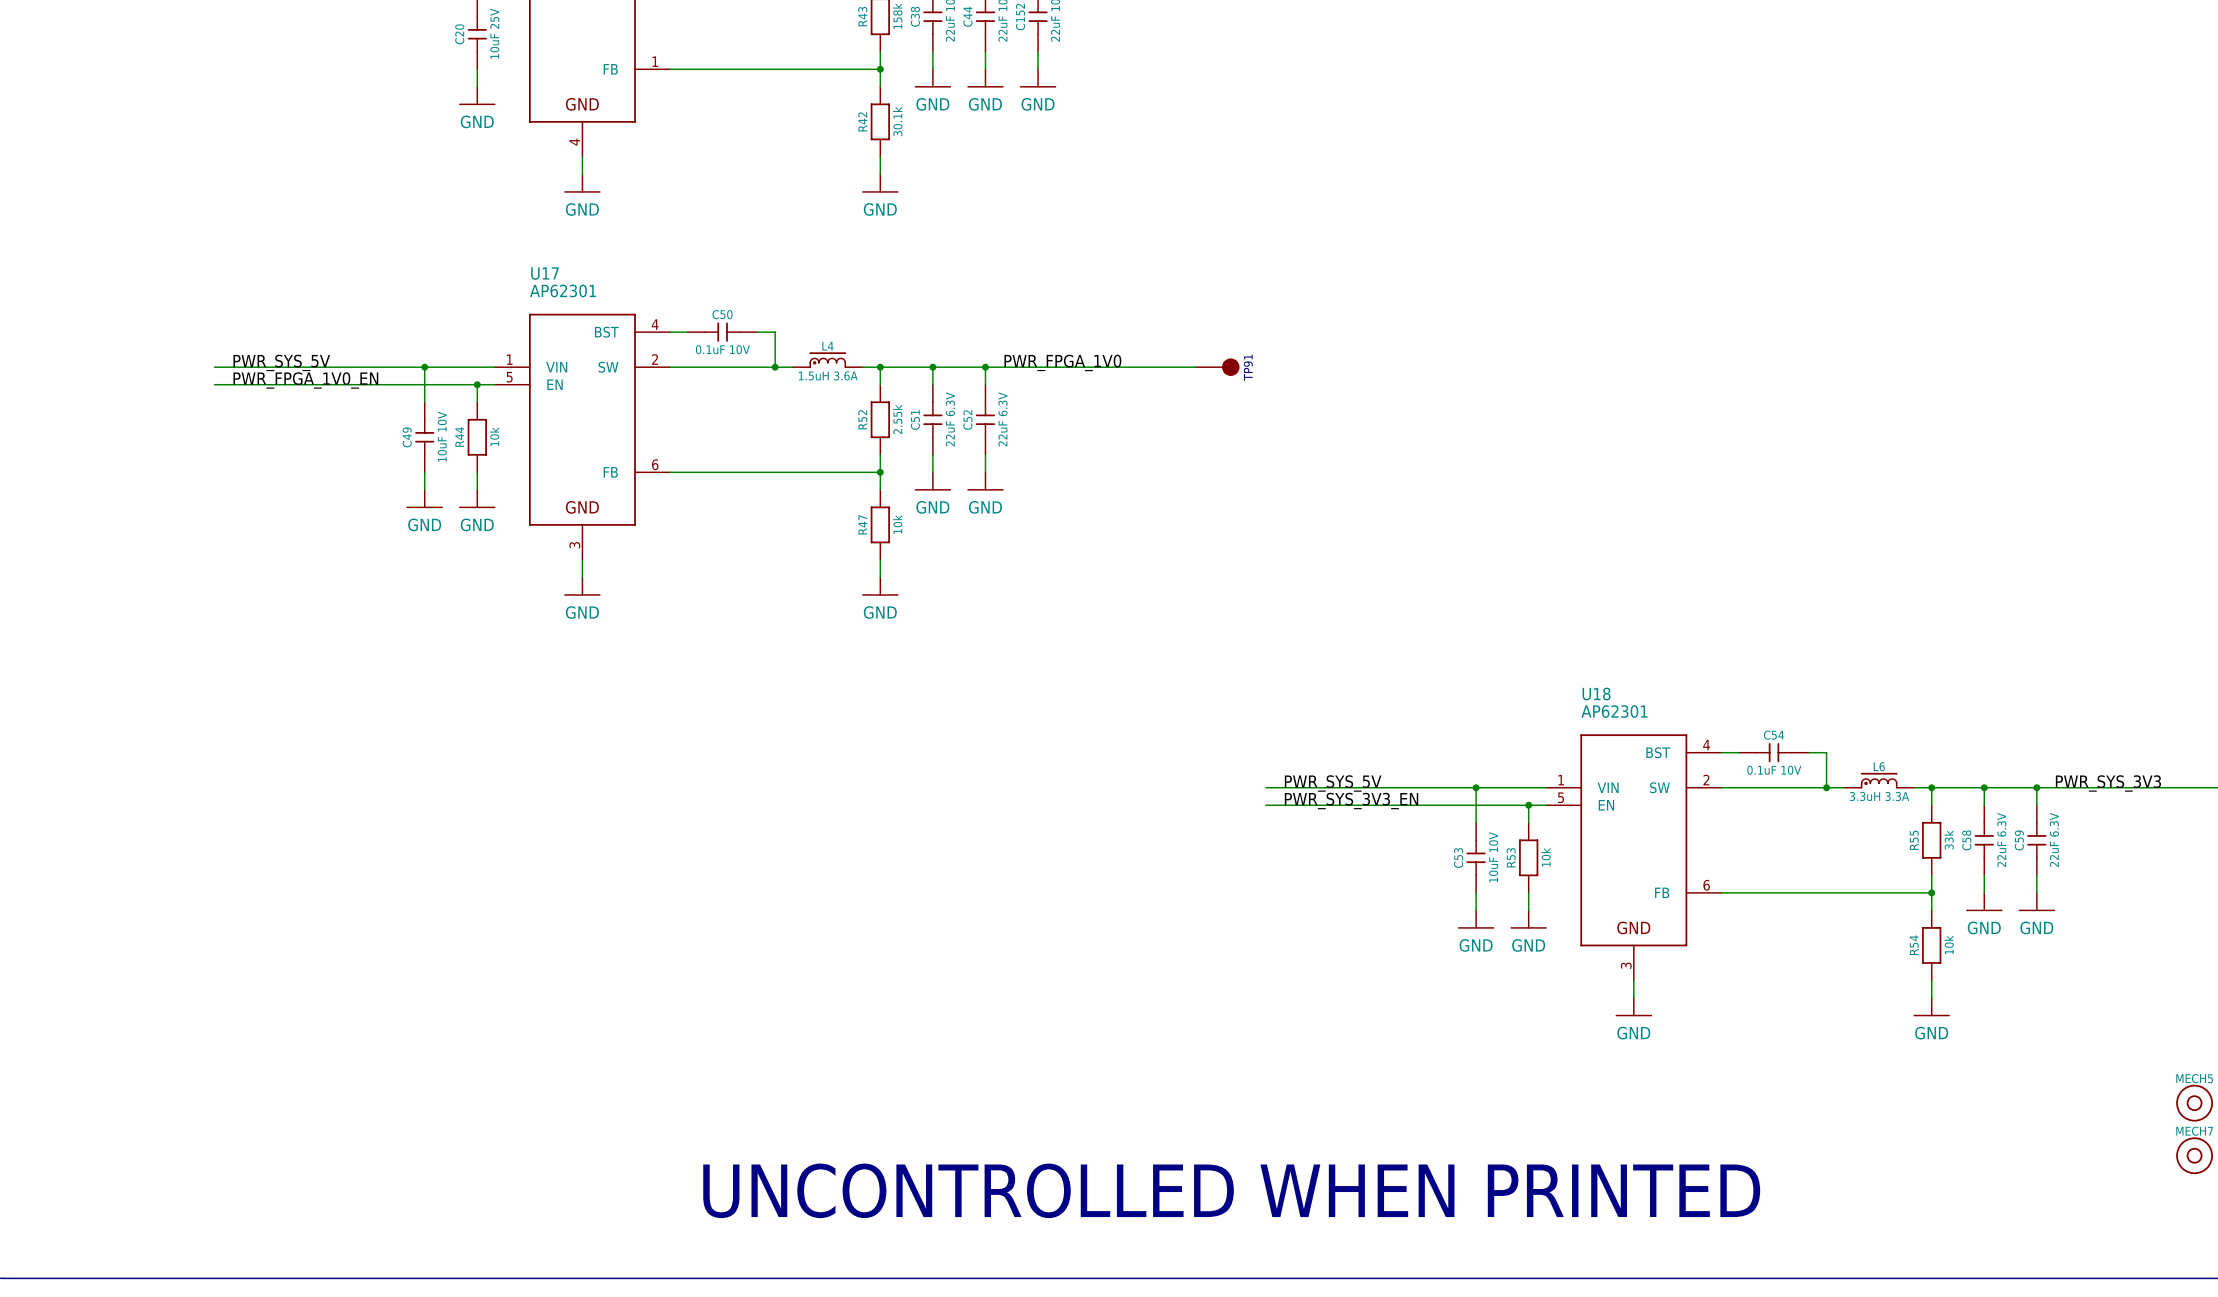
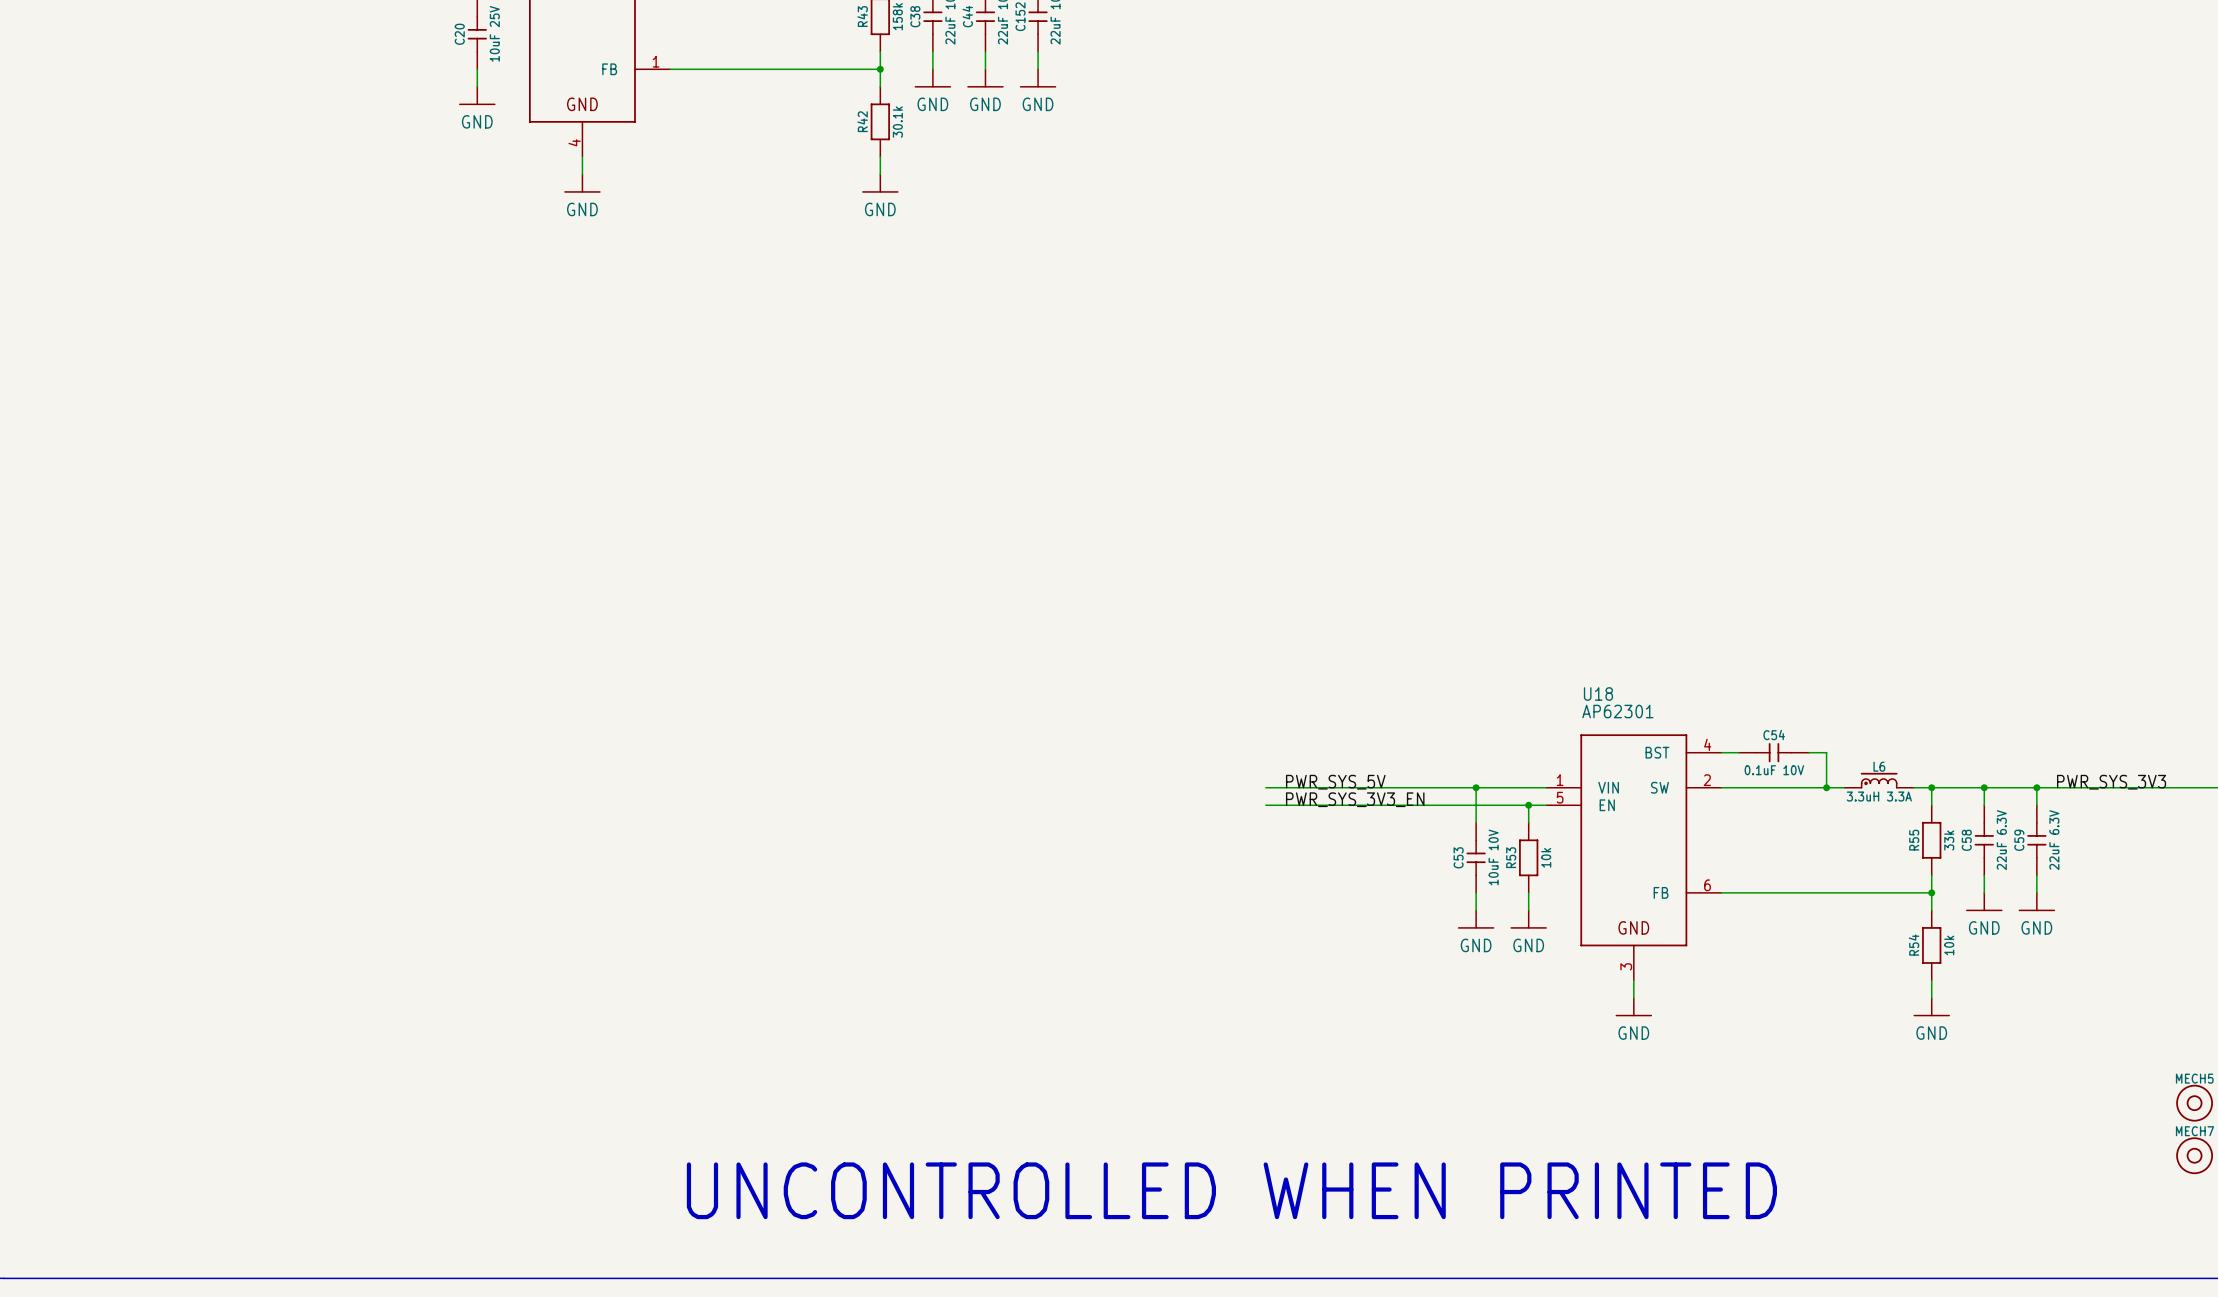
wire: (670, 332) (687, 332) -> none
C50: 0.1uF 10V (722, 332) -> none
wire: (757, 332) (775, 332) (775, 367) -> none
L4: 1.5uH 3.6A (827, 360) -> none
label: PWR_SYS_5V (281, 362) -> none
label: PWR_FPGA_1V0 (1062, 362) -> none
wire: (214, 367) (494, 367) -> none
wire: (424, 367) (424, 402) -> none
junction: (424, 367) -> none
wire: (670, 367) (792, 367) -> none
junction: (775, 367) -> none
wire: (862, 367) (1195, 367) -> none
wire: (880, 367) (880, 384) -> none
junction: (880, 367) -> none
wire: (932, 367) (932, 384) -> none
junction: (932, 367) -> none
wire: (985, 367) (985, 384) -> none
junction: (985, 367) -> none
TP91: (1217, 367) -> none
label: PWR_FPGA_1V0_EN (305, 380) -> none
wire: (214, 384) (494, 384) -> none
wire: (477, 384) (477, 402) -> none
junction: (477, 384) -> none
R52: 2.55k (880, 419) -> none
C51: 22uF 6.3V (932, 419) -> none
C52: 22uF 6.3V (985, 419) -> none
U17: AP62301 (582, 436) -> none
C49: 10uF 10V (424, 437) -> none
R44: 10k (477, 437) -> none
wire: (880, 454) (880, 489) -> none
wire: (932, 454) (932, 472) -> none
wire: (985, 454) (985, 472) -> none
wire: (424, 472) (424, 489) -> none
wire: (477, 472) (477, 489) -> none
wire: (670, 472) (880, 472) -> none
junction: (880, 472) -> none
power symbol: GND (932, 481) -> none
power symbol: GND (985, 481) -> none
power symbol: GND (424, 498) -> none
power symbol: GND (477, 498) -> none
R47: 10k (880, 524) -> none
wire: (582, 559) (582, 577) -> none
wire: (880, 559) (880, 577) -> none
power symbol: GND (582, 586) -> none
power symbol: GND (880, 586) -> none

